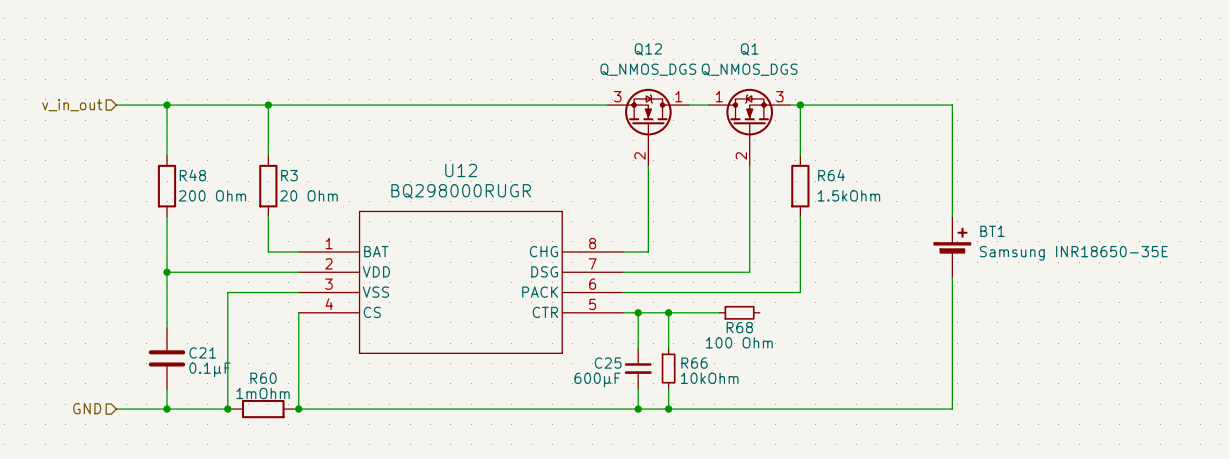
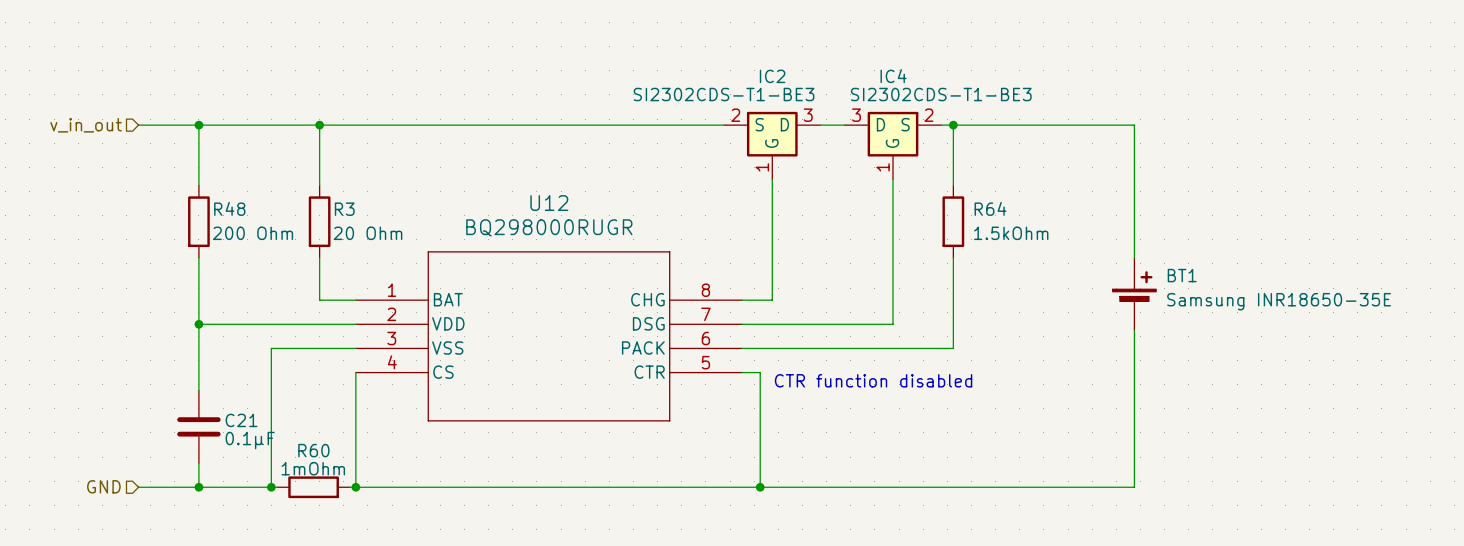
IC2: none -> SI2302CDS-T1-BE3 (772, 145)
IC4: none -> SI2302CDS-T1-BE3 (893, 145)
Q12: Q_NMOS_DGS (648, 127) -> none
Q1: Q_NMOS_DGS (749, 127) -> none
wire: (638, 312) (719, 312) -> none
junction: (638, 312) -> none
wire: (668, 312) (668, 348) -> none
junction: (668, 312) -> none
R68: 100 Ohm (739, 312) -> none
text: none -> CTR function disabled (873, 380)
C25: 600µF (638, 368) -> none
R66: 10kOhm (668, 368) -> none
wire: (668, 388) (668, 409) -> none
junction: (668, 409) -> none

